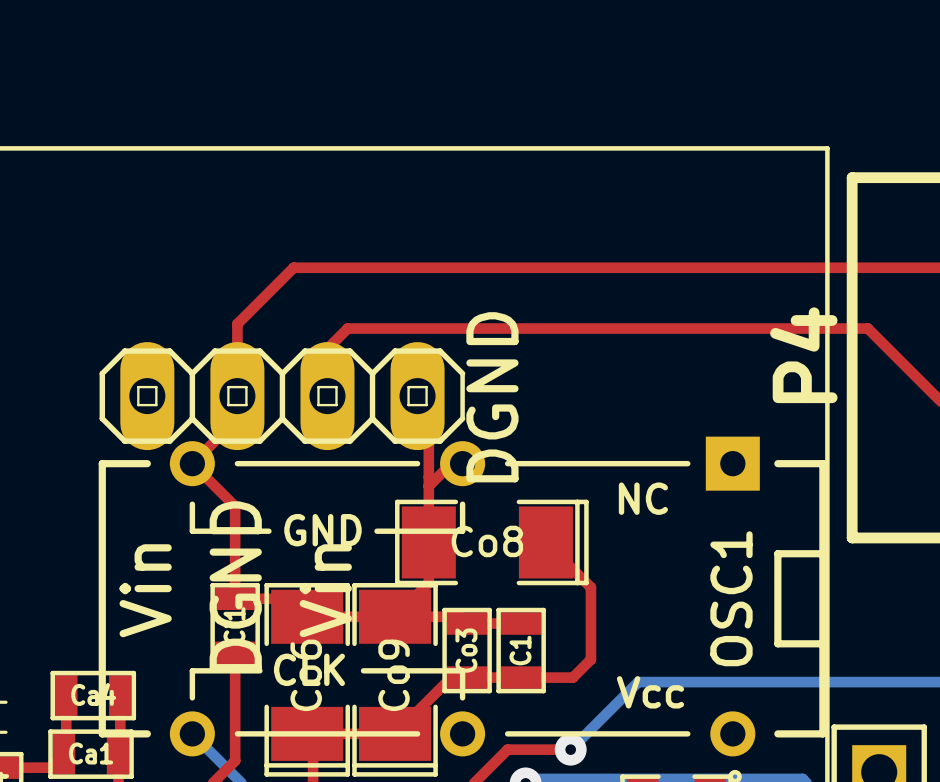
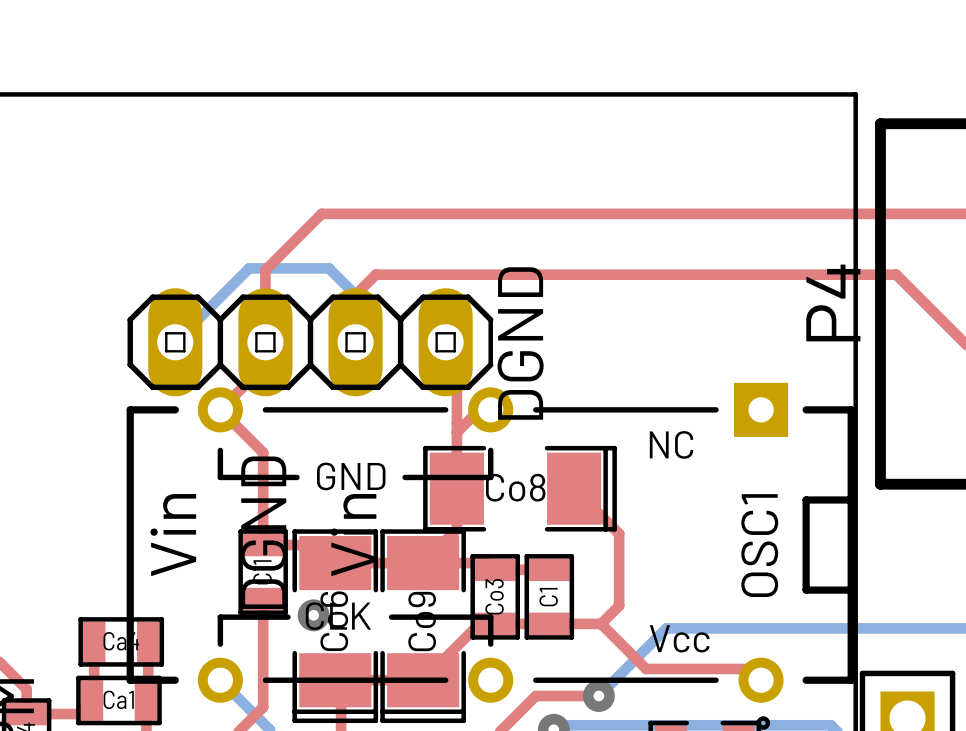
bottom track: none -> (175, 342) (249, 268) (328, 268) (355, 294) (355, 342)
via: none -> (313, 615)
top track: none -> (601, 623) (646, 668) (749, 668) (761, 680)

